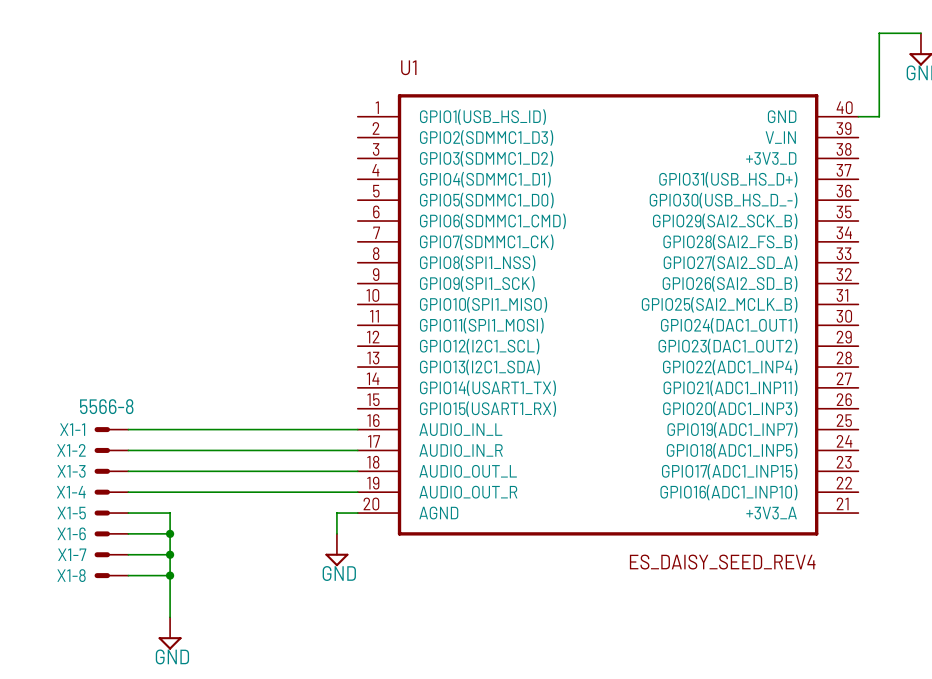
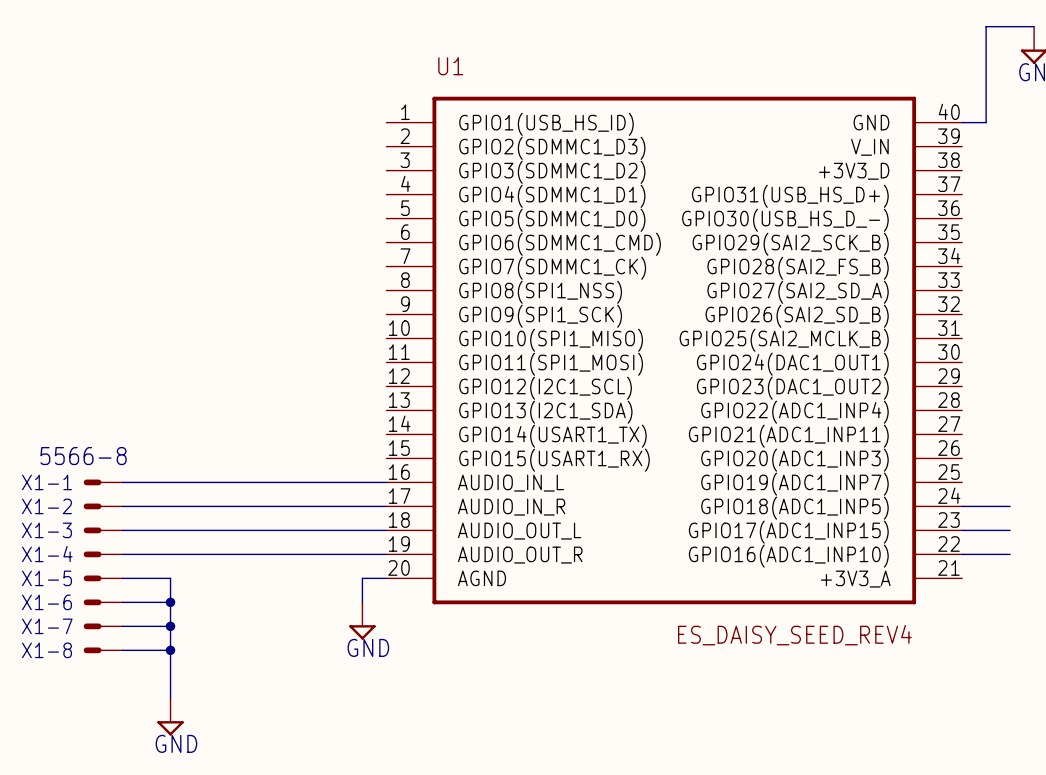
wire: none -> (962, 506) (1010, 506)
wire: none -> (962, 530) (1010, 530)
wire: none -> (962, 554) (1010, 554)

